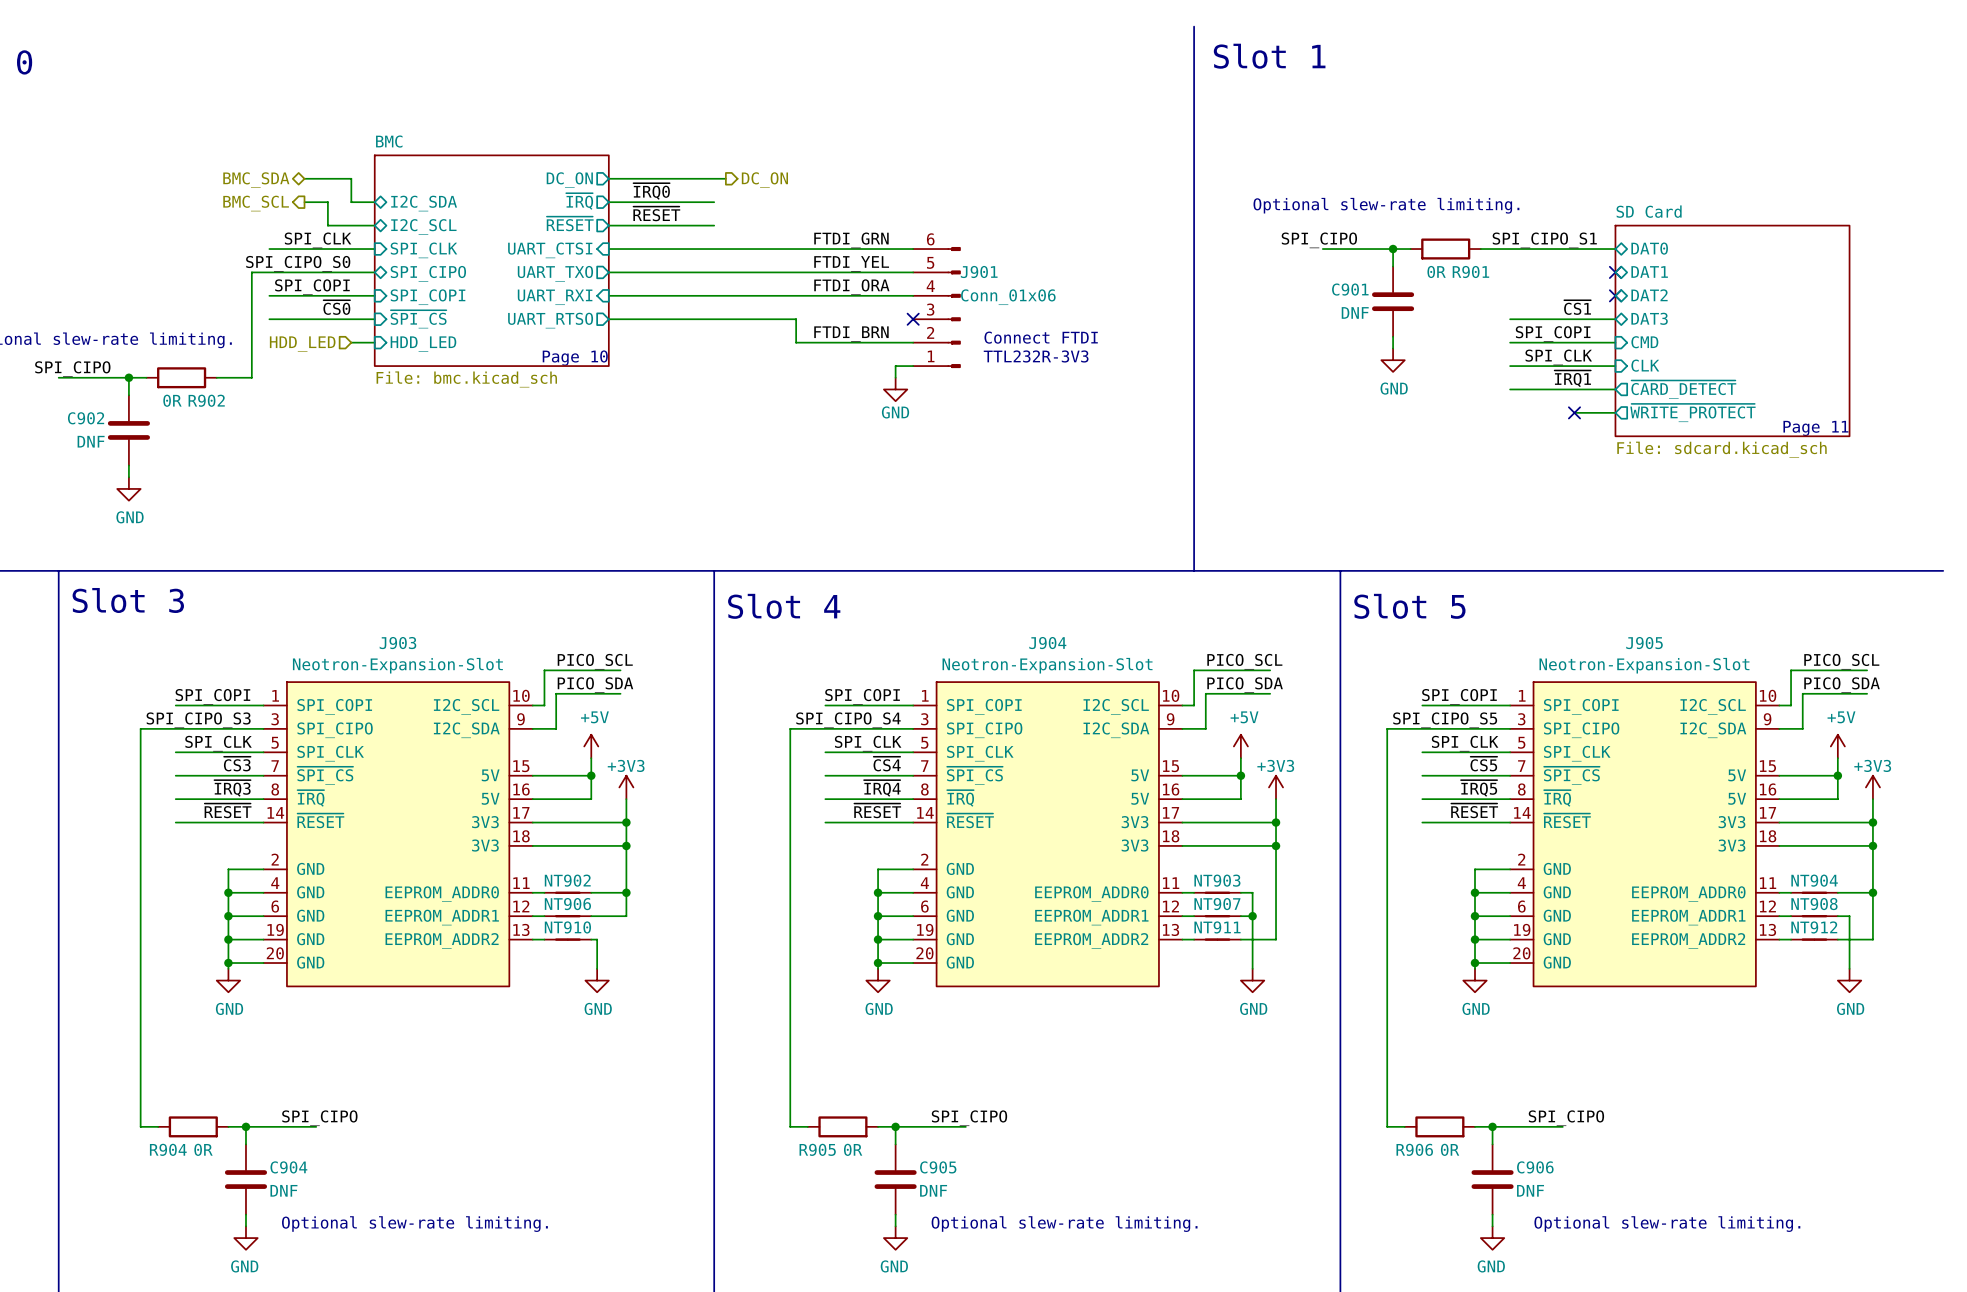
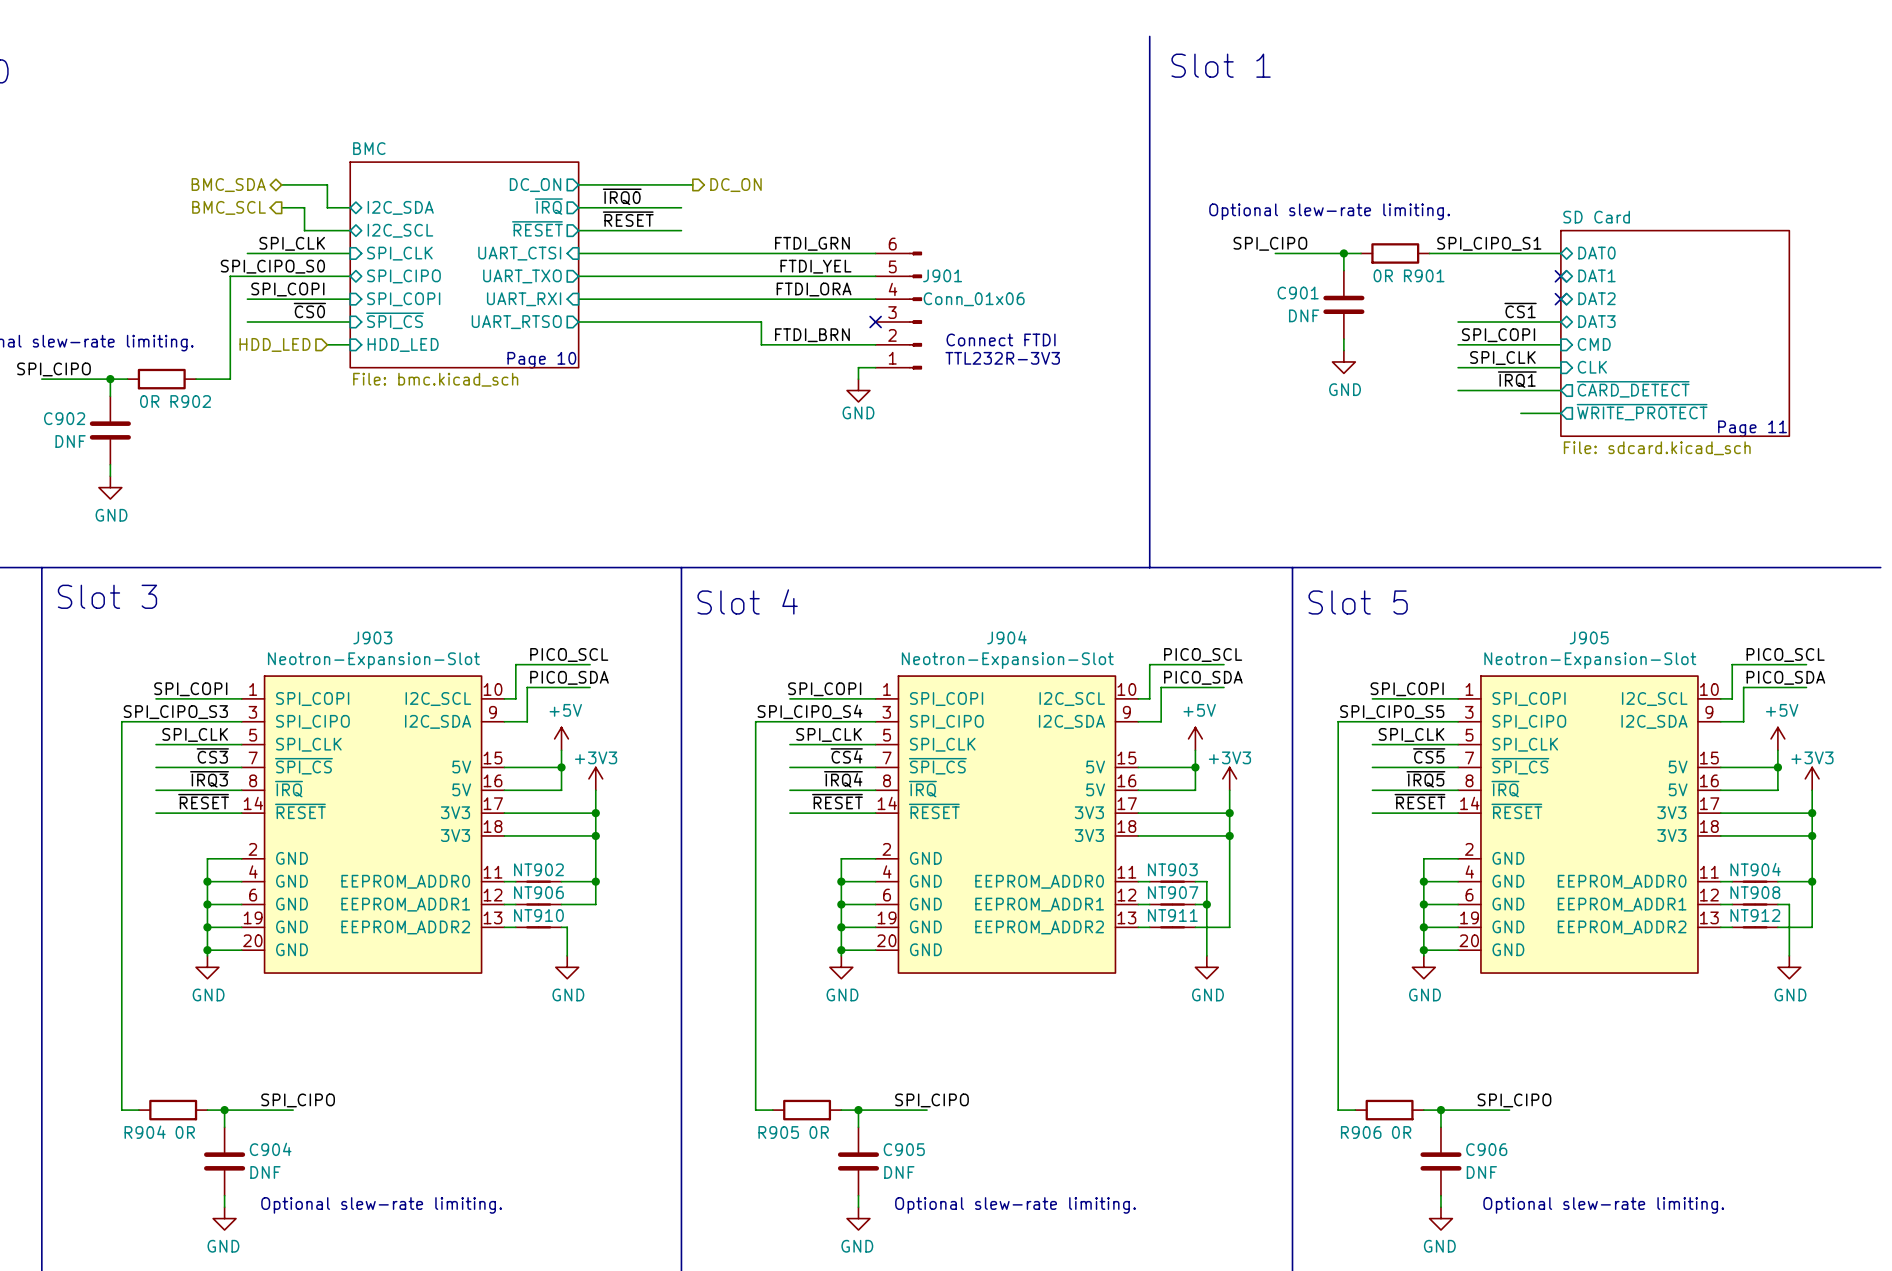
no-connect mark: (1574, 412) -> none

